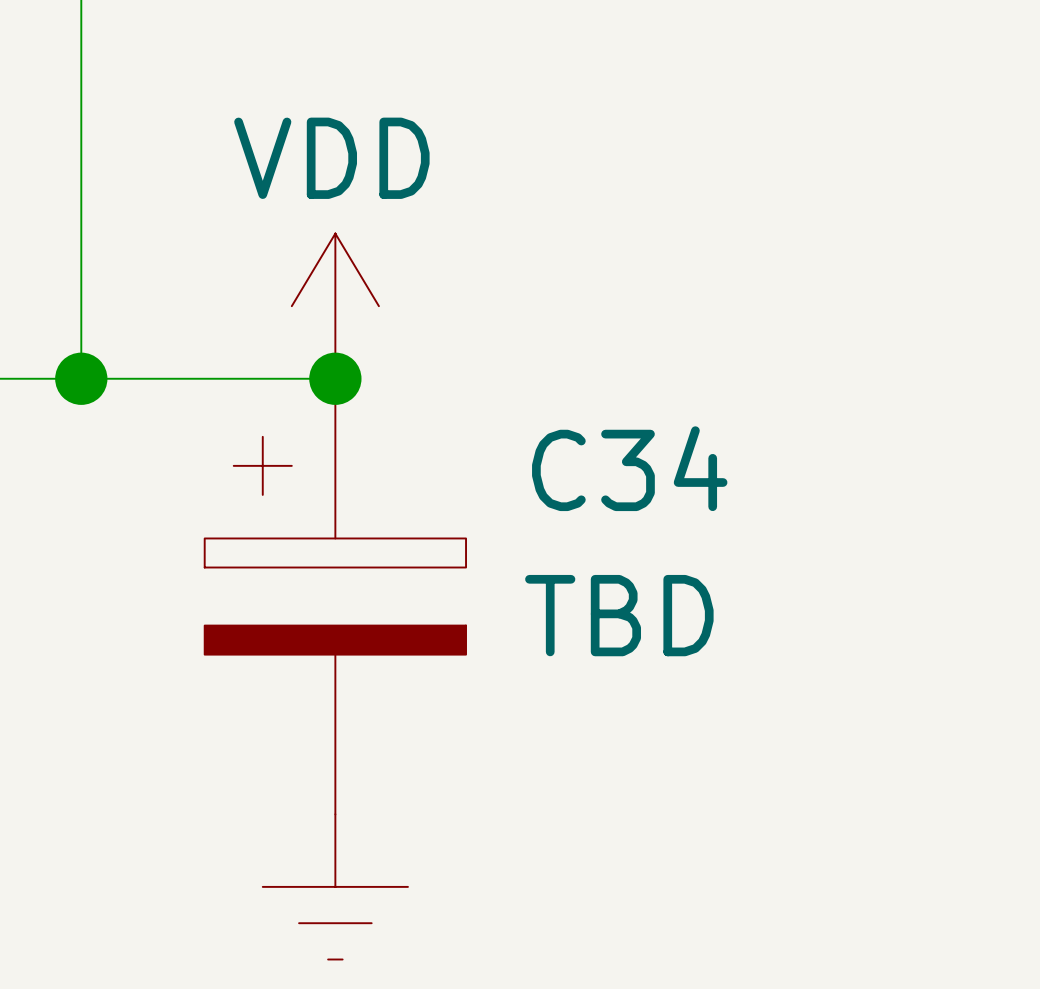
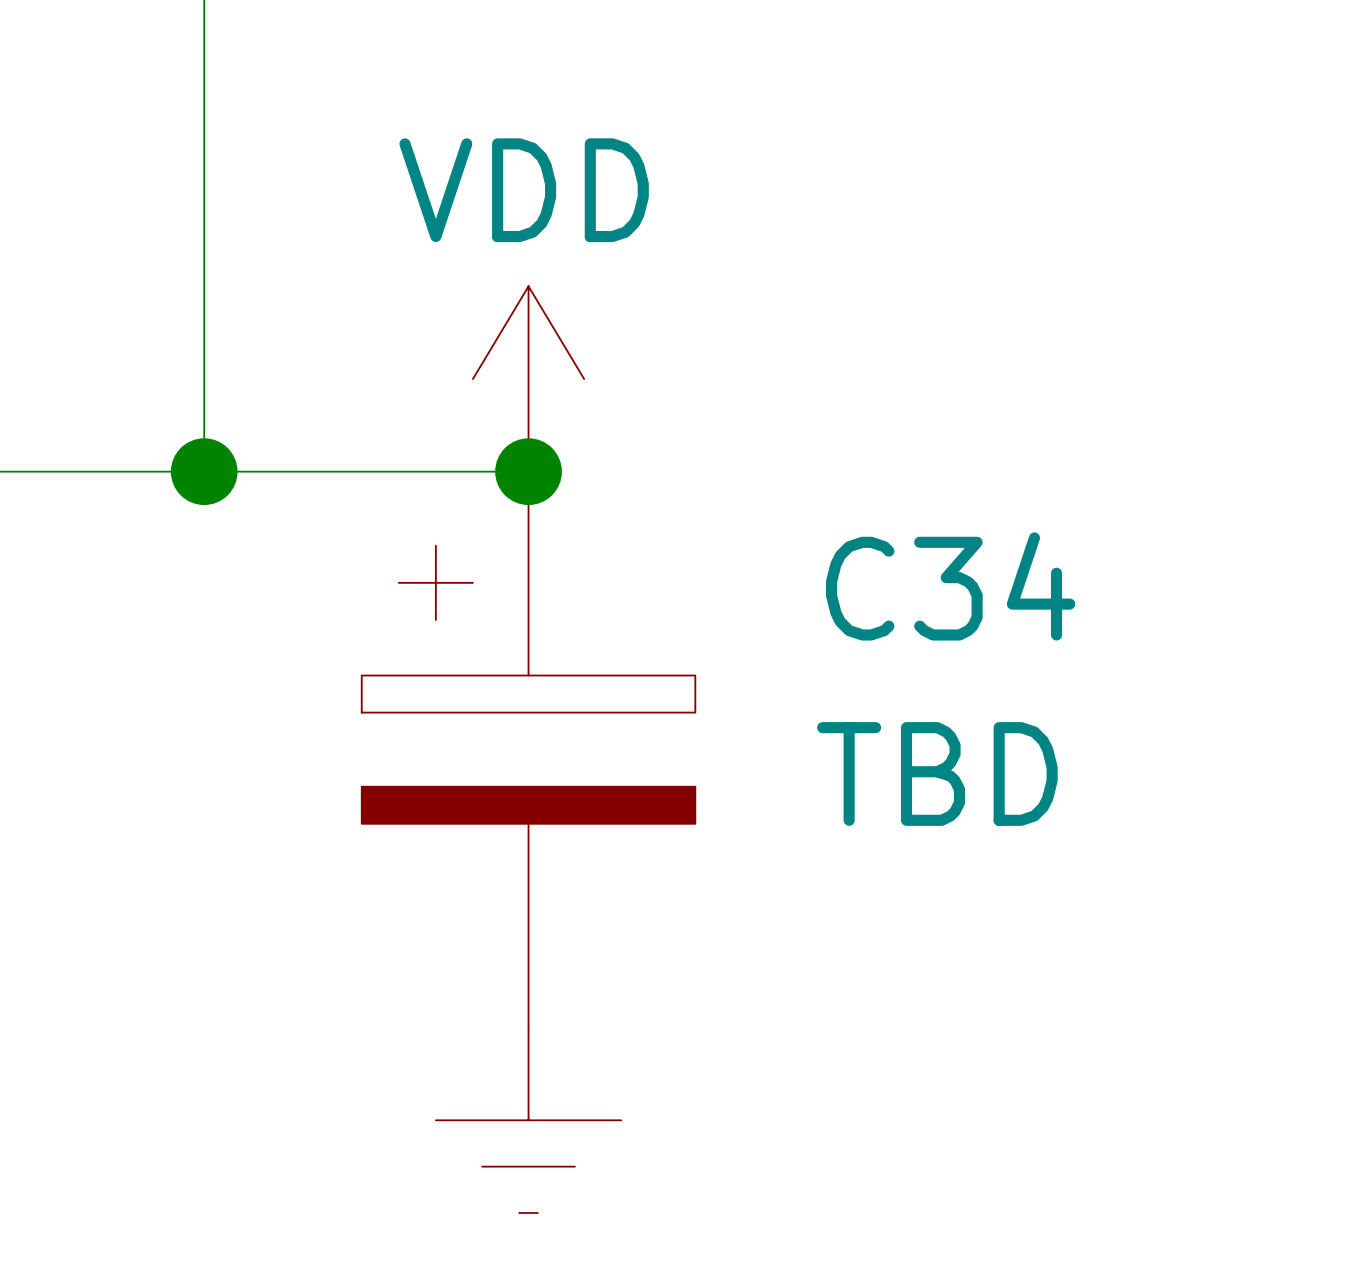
C34 name position: C34 (629, 468) -> C34 (950, 586)
C34 value position: TBD (619, 615) -> TBD (937, 773)

